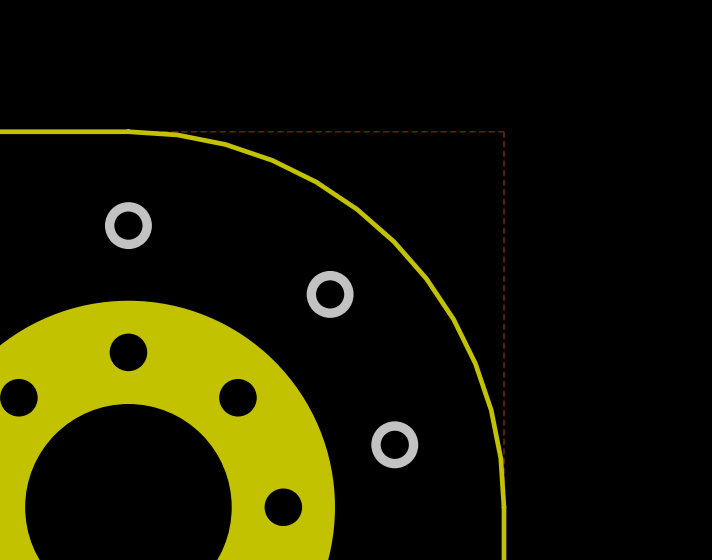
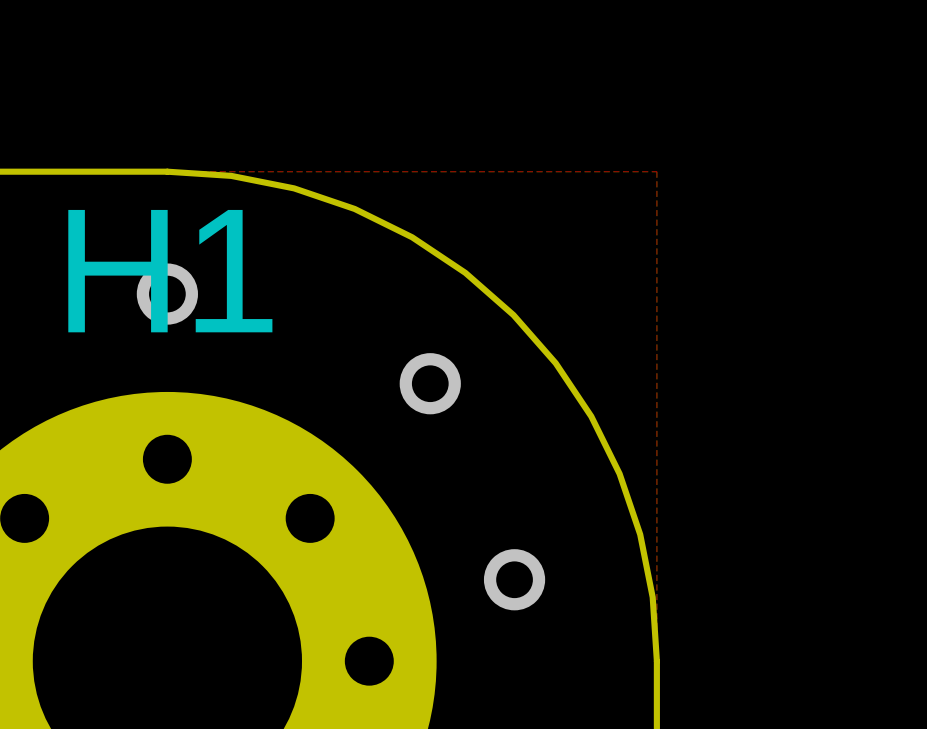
H1 name: none -> H1 (170, 271)

